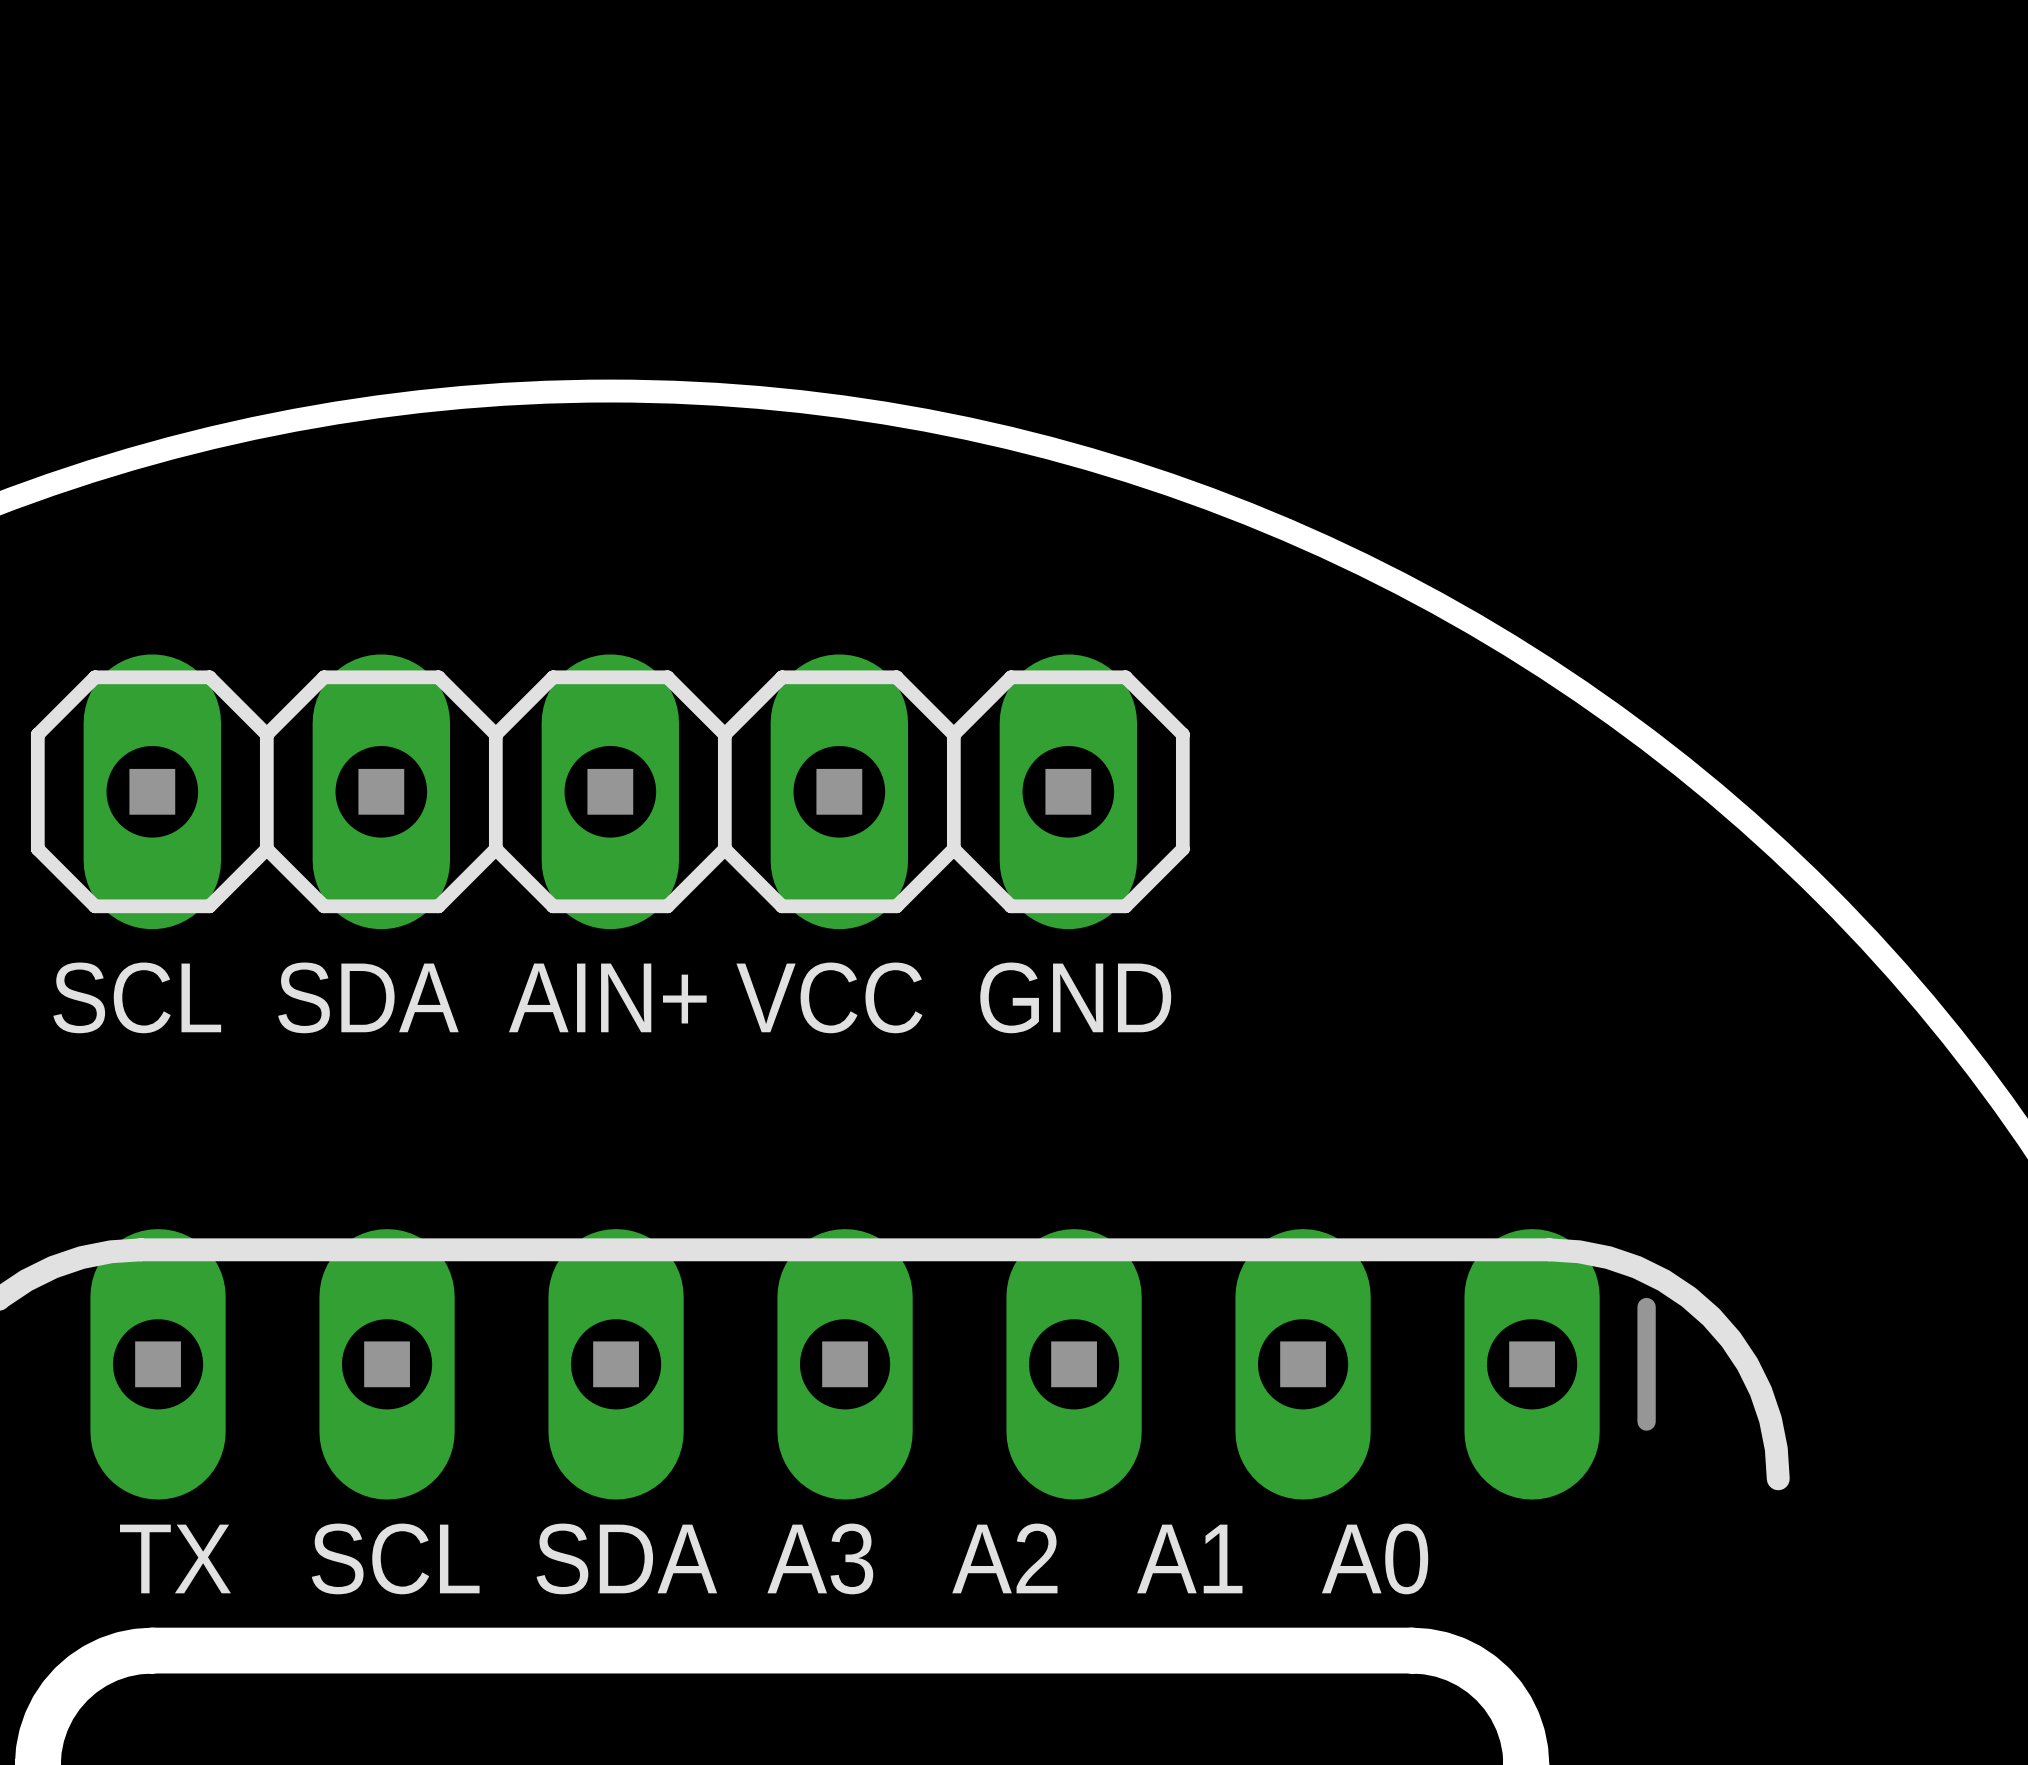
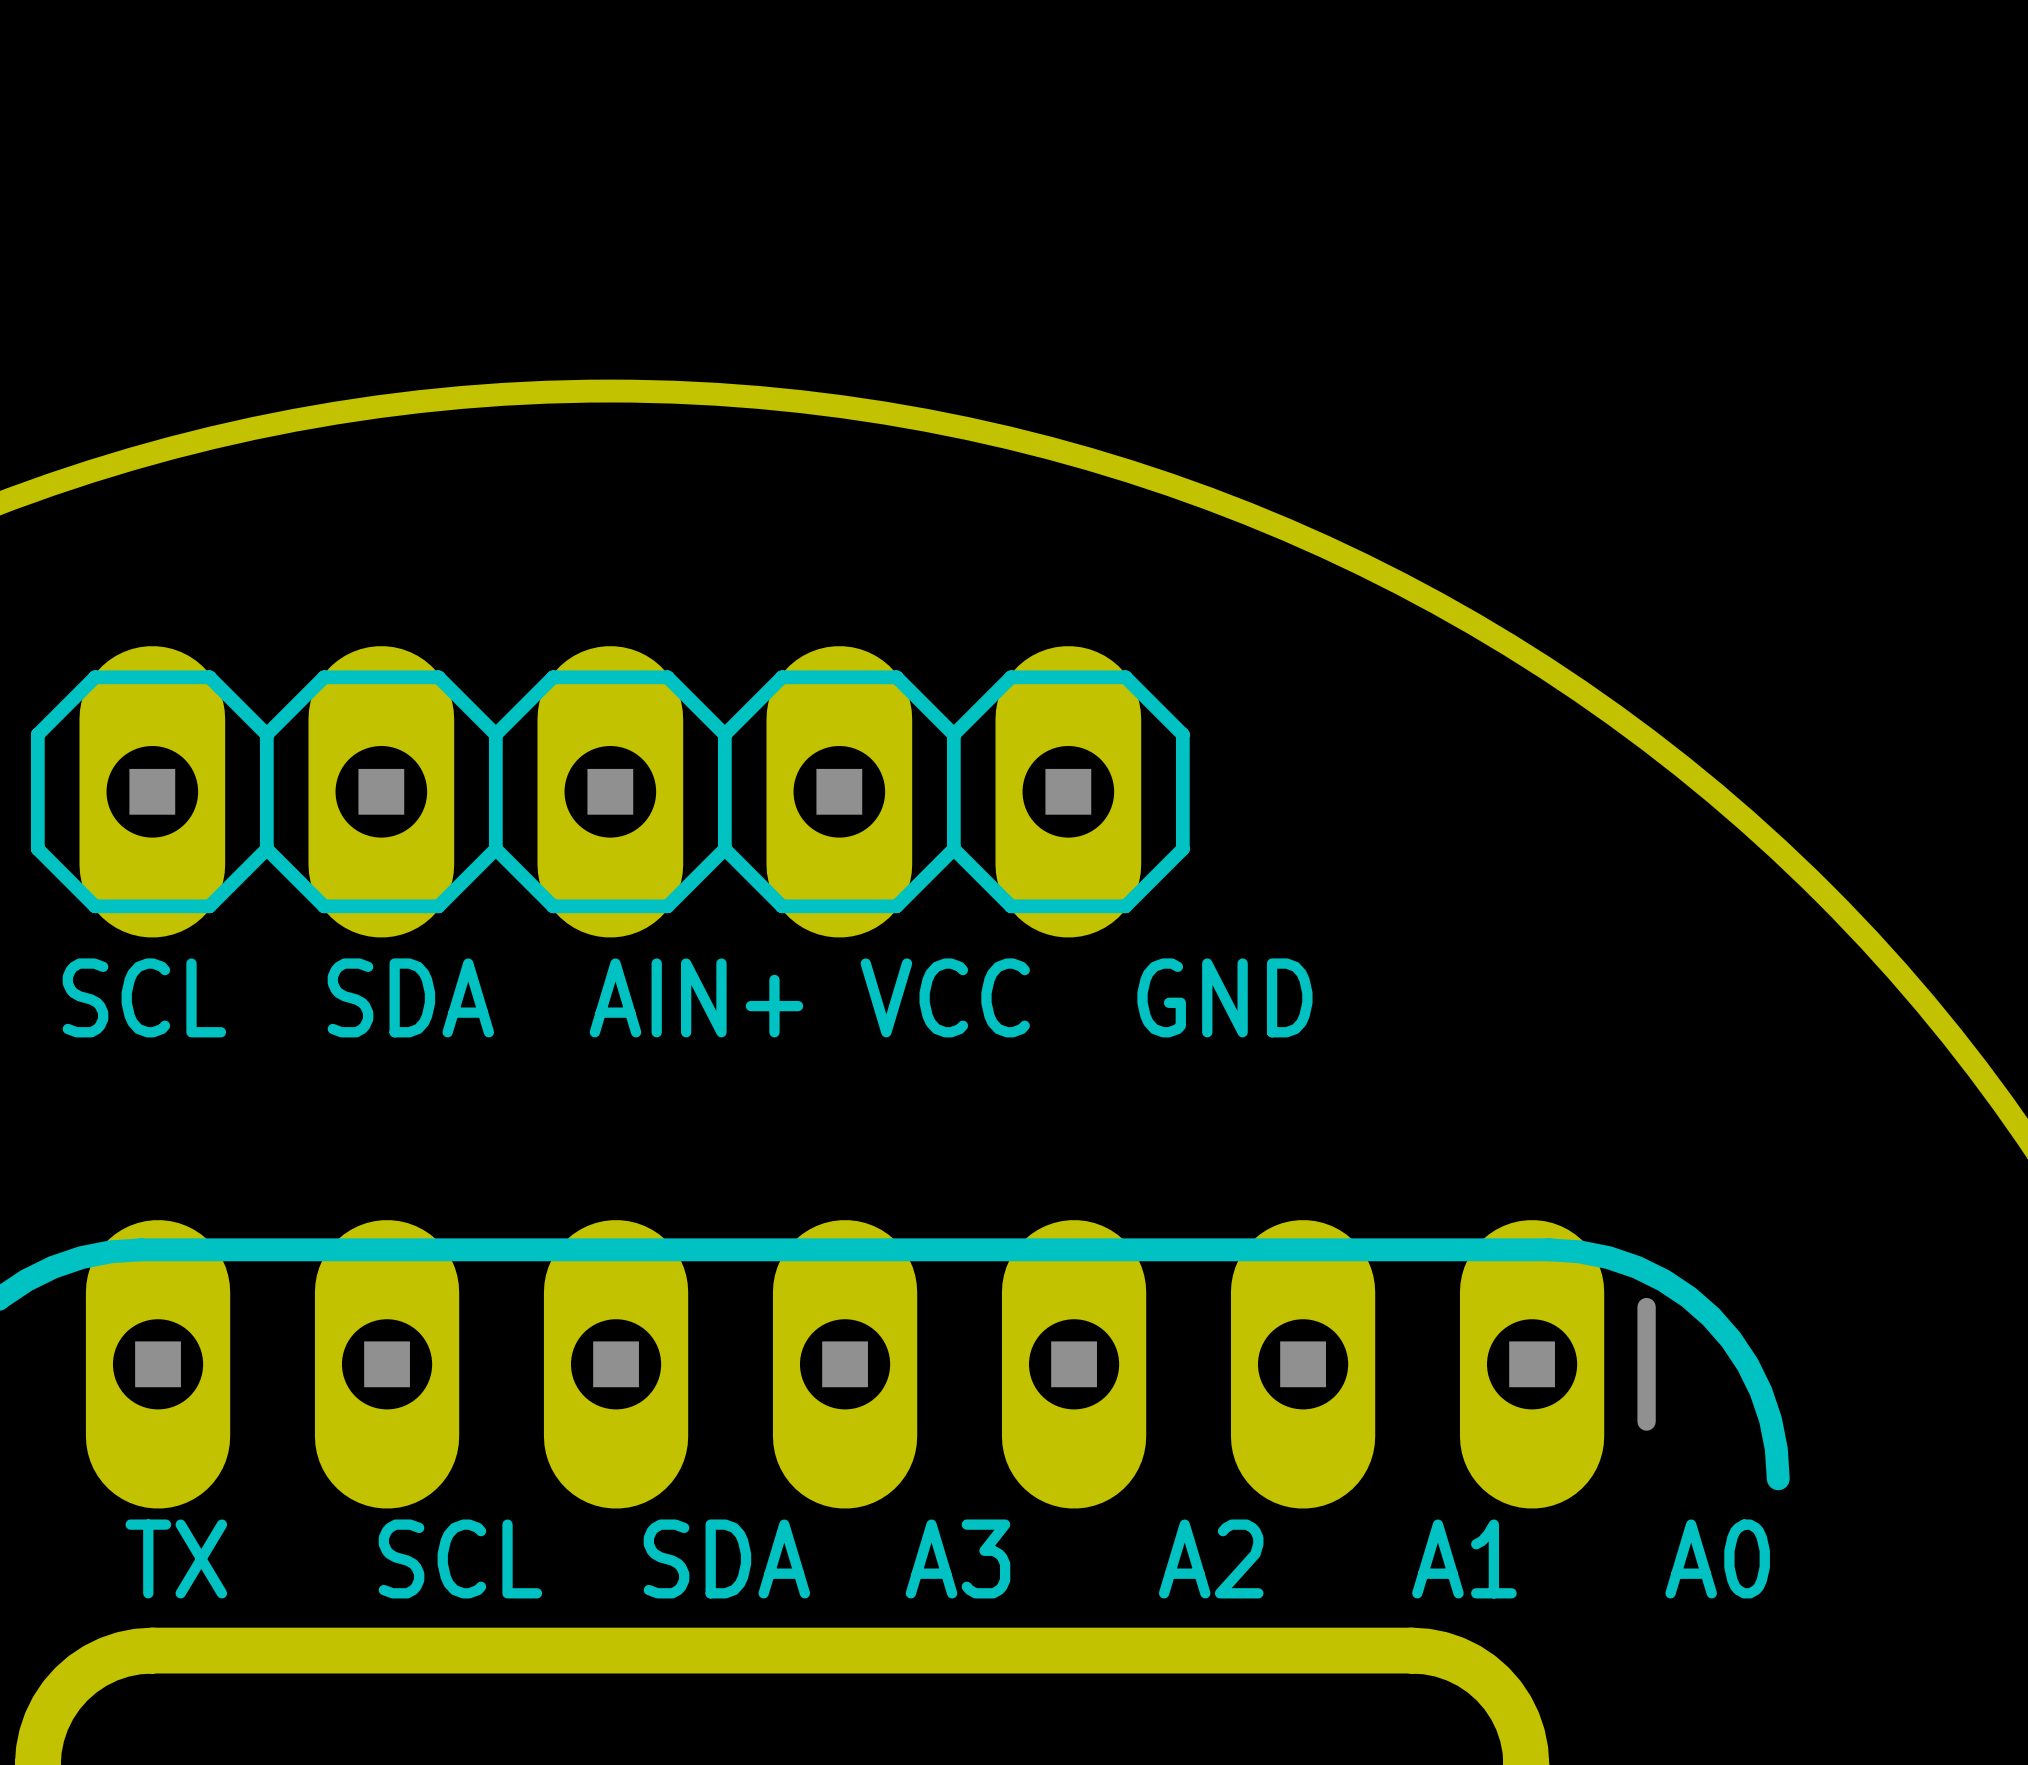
part footprint: [30, 654, 1190, 930] -> [30, 646, 1190, 938]
part footprint: [90, 1229, 1656, 1500] -> [85, 1220, 1656, 1509]

